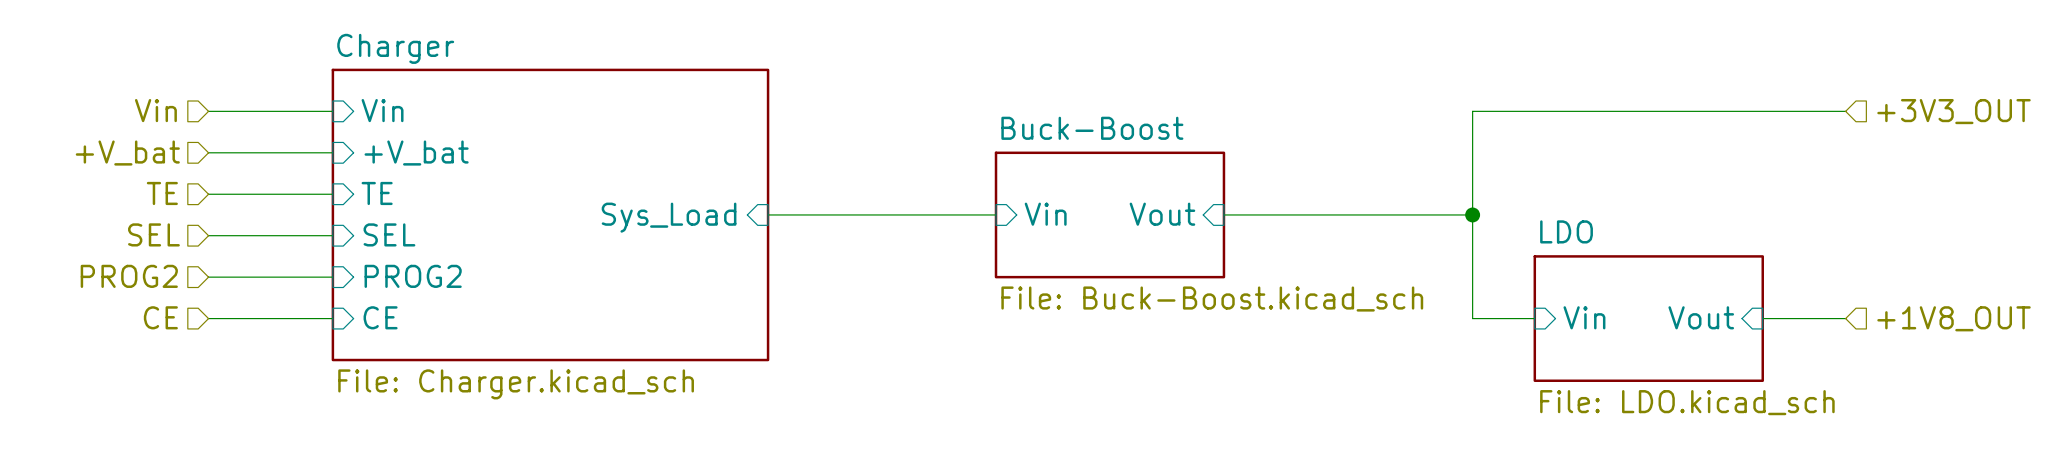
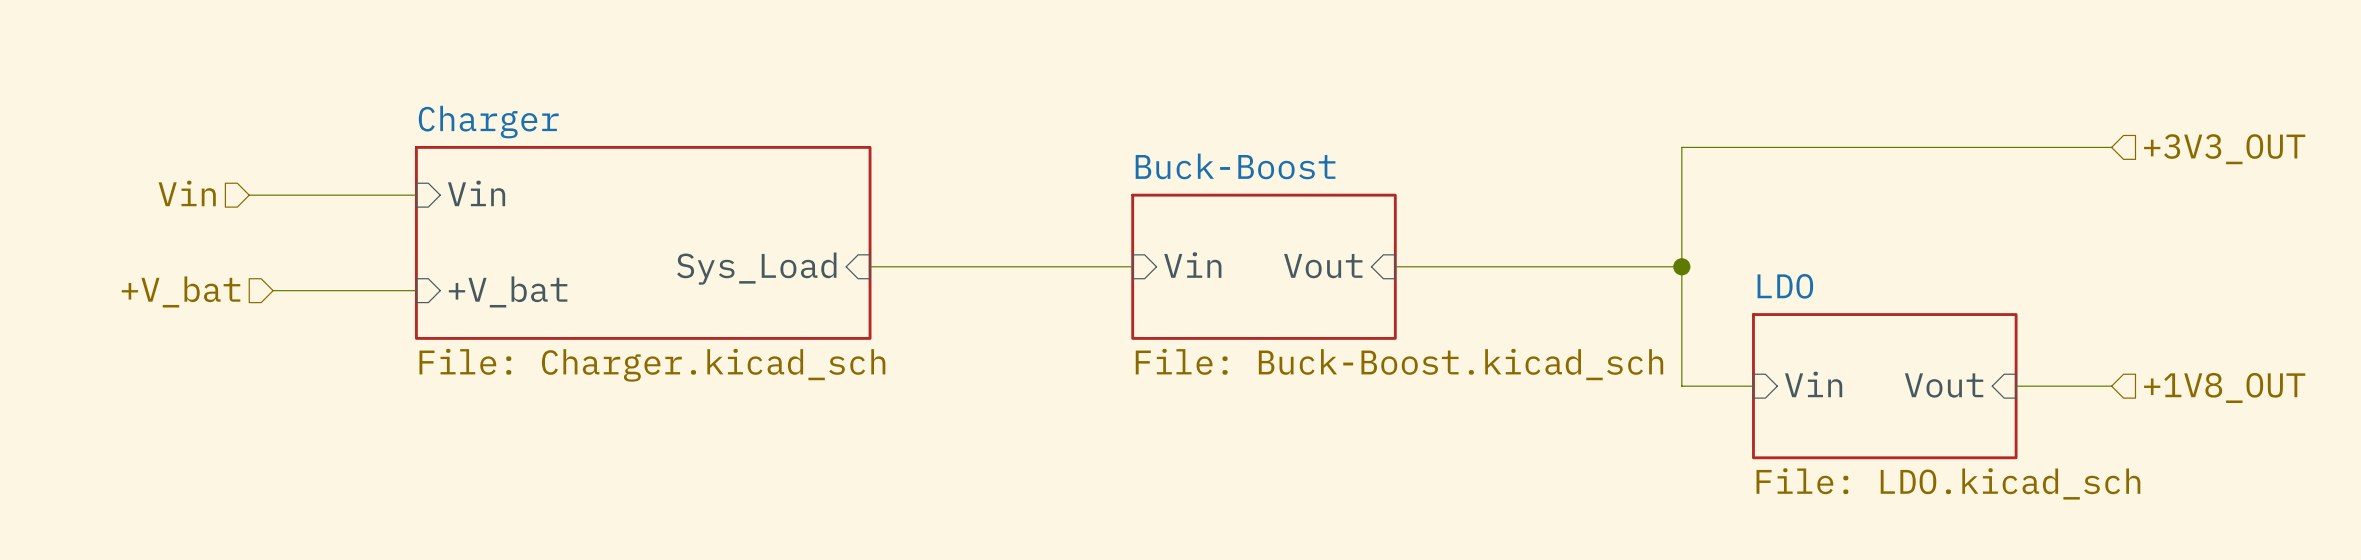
hierarchical label position: Vin (155, 110) -> Vin (187, 193)
sheet pin position: Vin (382, 110) -> Vin (476, 193)
wire: (208, 111) (332, 111) -> none
wire: (208, 152) (229, 152) -> none
wire: none -> (368, 195) (416, 195)
hierarchical label position: +V_bat (127, 153) -> +V_bat (181, 291)
sheet pin position: +V_bat (416, 153) -> +V_bat (508, 291)
hierarchical label: TE (162, 193) -> none
sheet pin: TE (377, 193) -> none
wire: (208, 194) (332, 194) -> none
sheet Charger: none -> File: Charger.kicad_sch (643, 242)
sheet Charger: File: Charger.kicad_sch (550, 214) -> none
hierarchical label: SEL (153, 234) -> none
sheet pin: SEL (389, 234) -> none
wire: (208, 235) (249, 235) -> (368, 290) (416, 290)
hierarchical label: PROG2 (129, 276) -> none
sheet pin: PROG2 (413, 276) -> none
wire: (208, 277) (332, 277) -> none
hierarchical label: CE (160, 317) -> none
sheet pin: CE (380, 317) -> none
wire: (208, 318) (332, 318) -> none

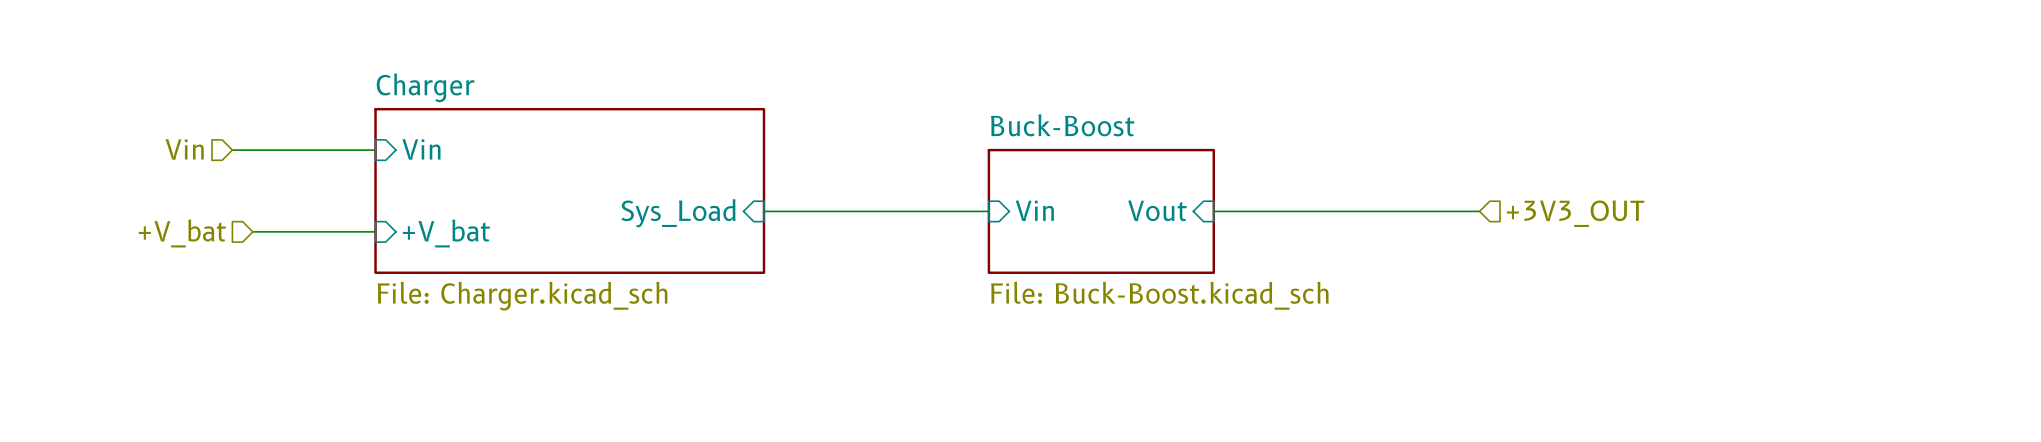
wire: (2111, 147) (1681, 147) (1681, 386) (1753, 386) -> none
hierarchical label position: +3V3_OUT (2224, 149) -> +3V3_OUT (1575, 213)
wire: none -> (1459, 211) (1479, 211)
junction: (1681, 266) -> none
sheet pin: Vin (1813, 384) -> none
sheet pin: Vout (1944, 385) -> none
sheet LDO: File: LDO.kicad_sch (1884, 386) -> none
wire: (2016, 386) (2111, 386) -> none
hierarchical label: +1V8_OUT (2224, 387) -> none

